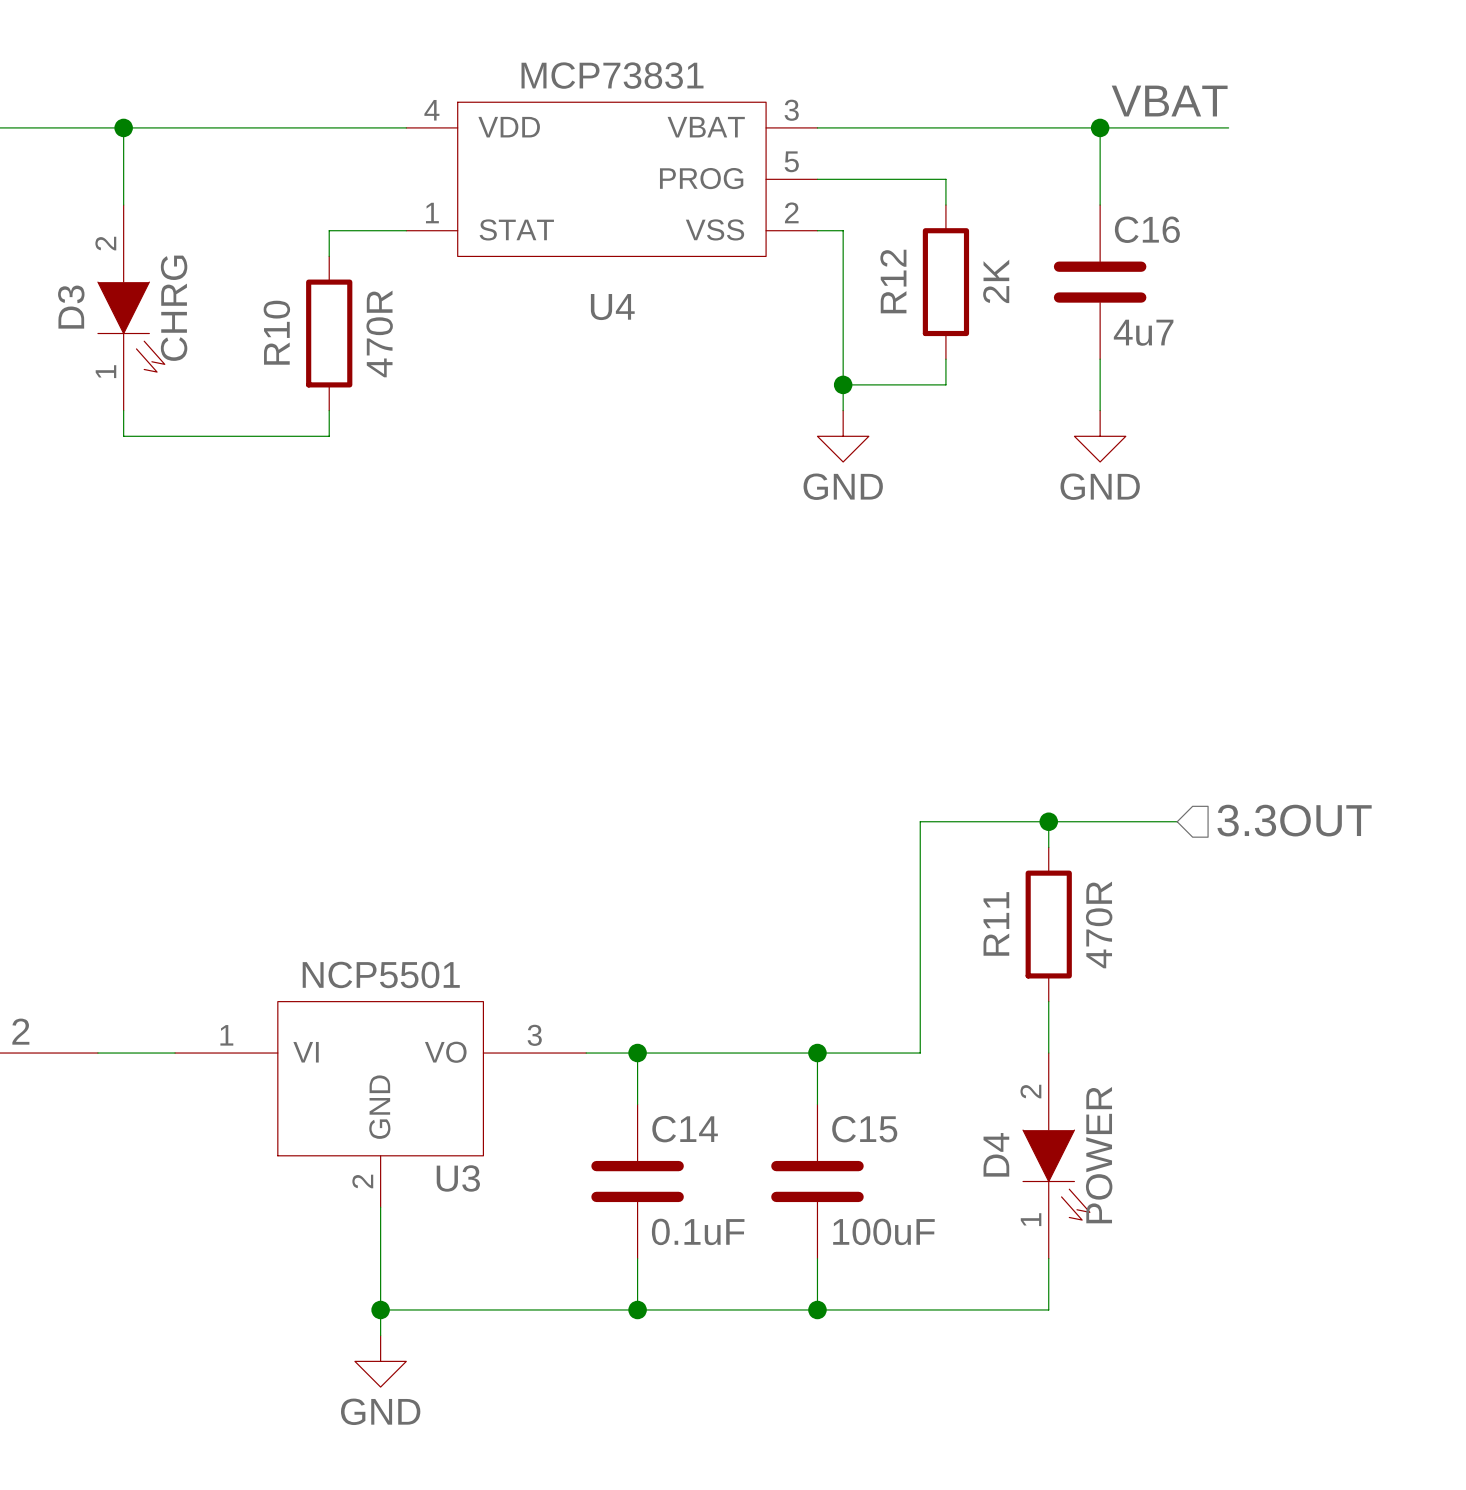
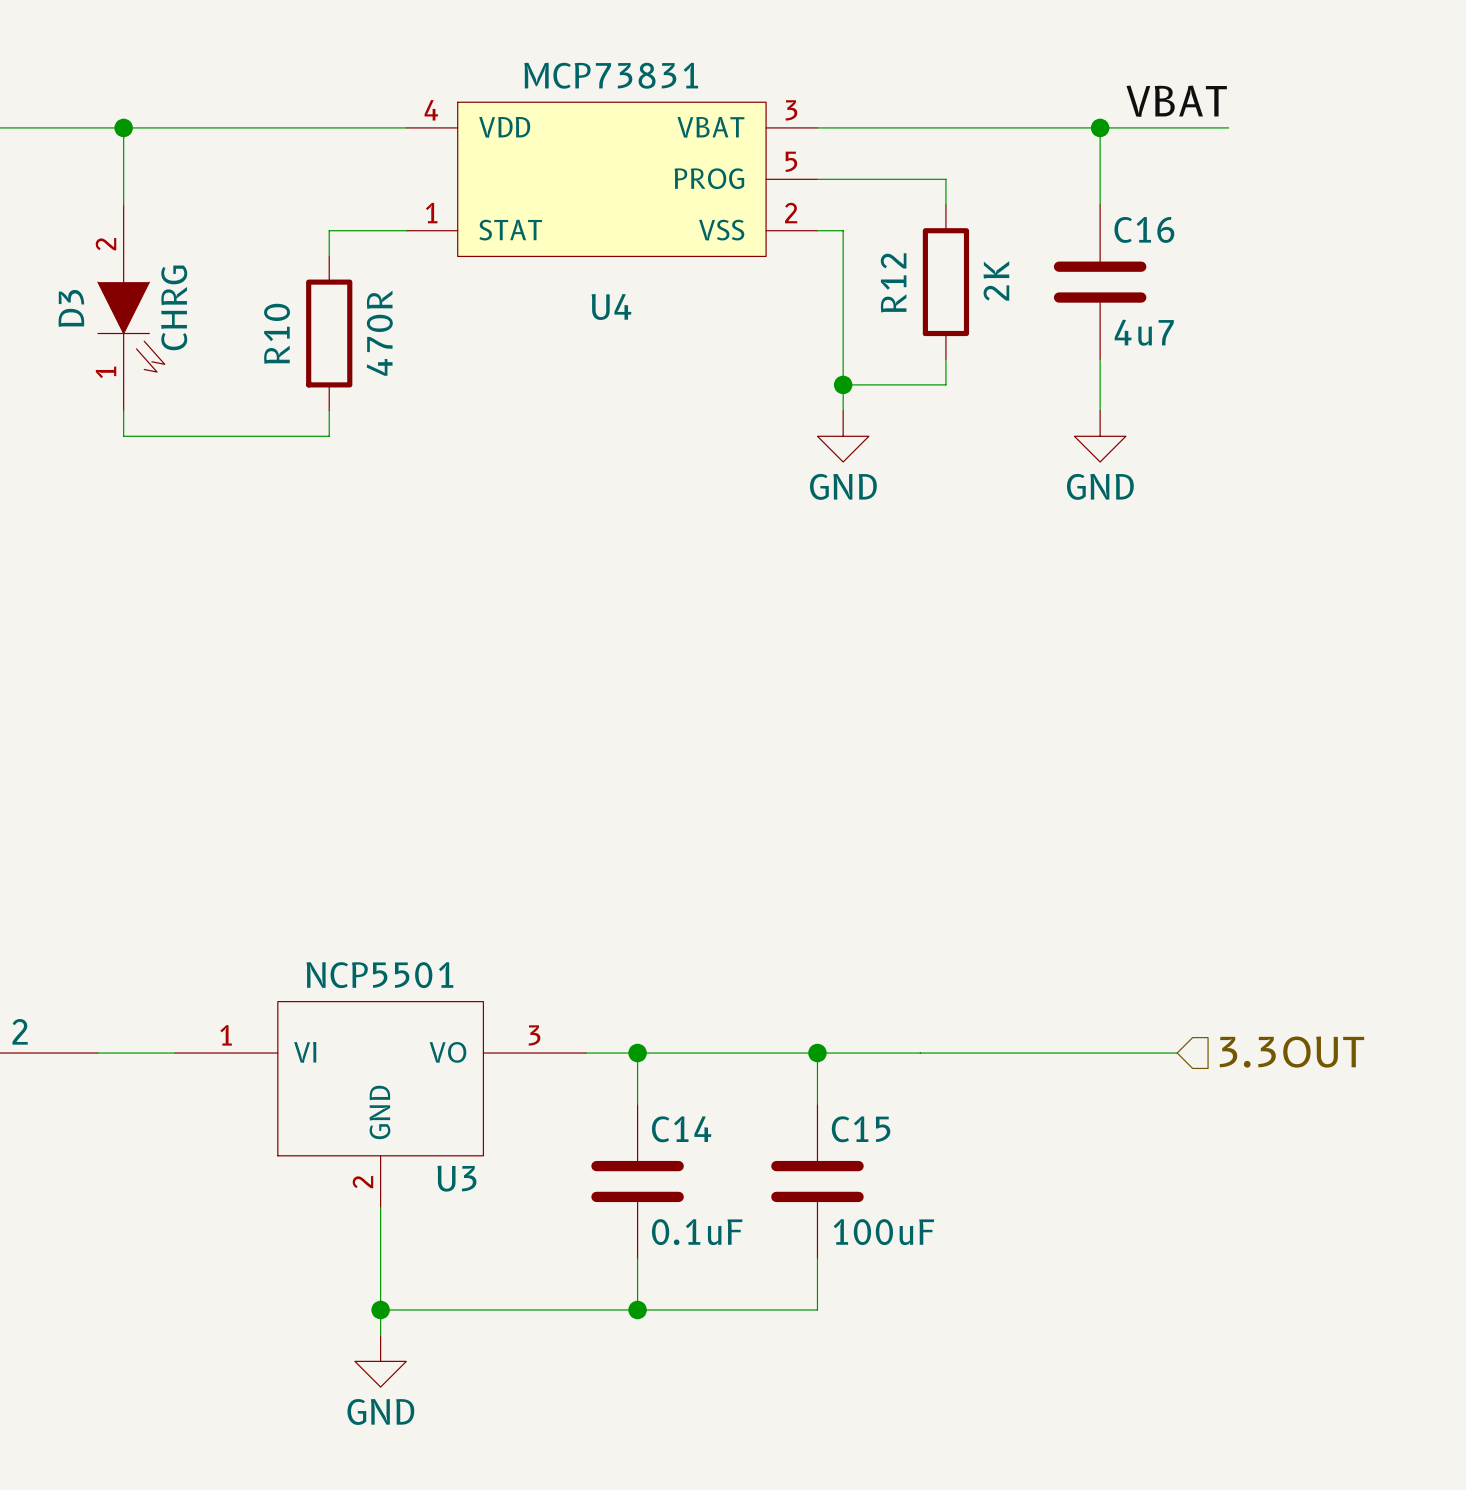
hierarchical label position: 3.3OUT (1294, 820) -> 3.3OUT (1291, 1052)
wire: (1048, 821) (1048, 847) -> none
junction: (1048, 821) -> none
wire: (1177, 821) (920, 821) (920, 1053) -> (1177, 1053) (920, 1053)
R11: 470R (1048, 924) -> none
wire: (1048, 1001) (1048, 1053) -> none
D4: POWER (1056, 1155) -> none
wire: (1048, 1258) (1048, 1309) (817, 1309) -> none
junction: (817, 1309) -> none

